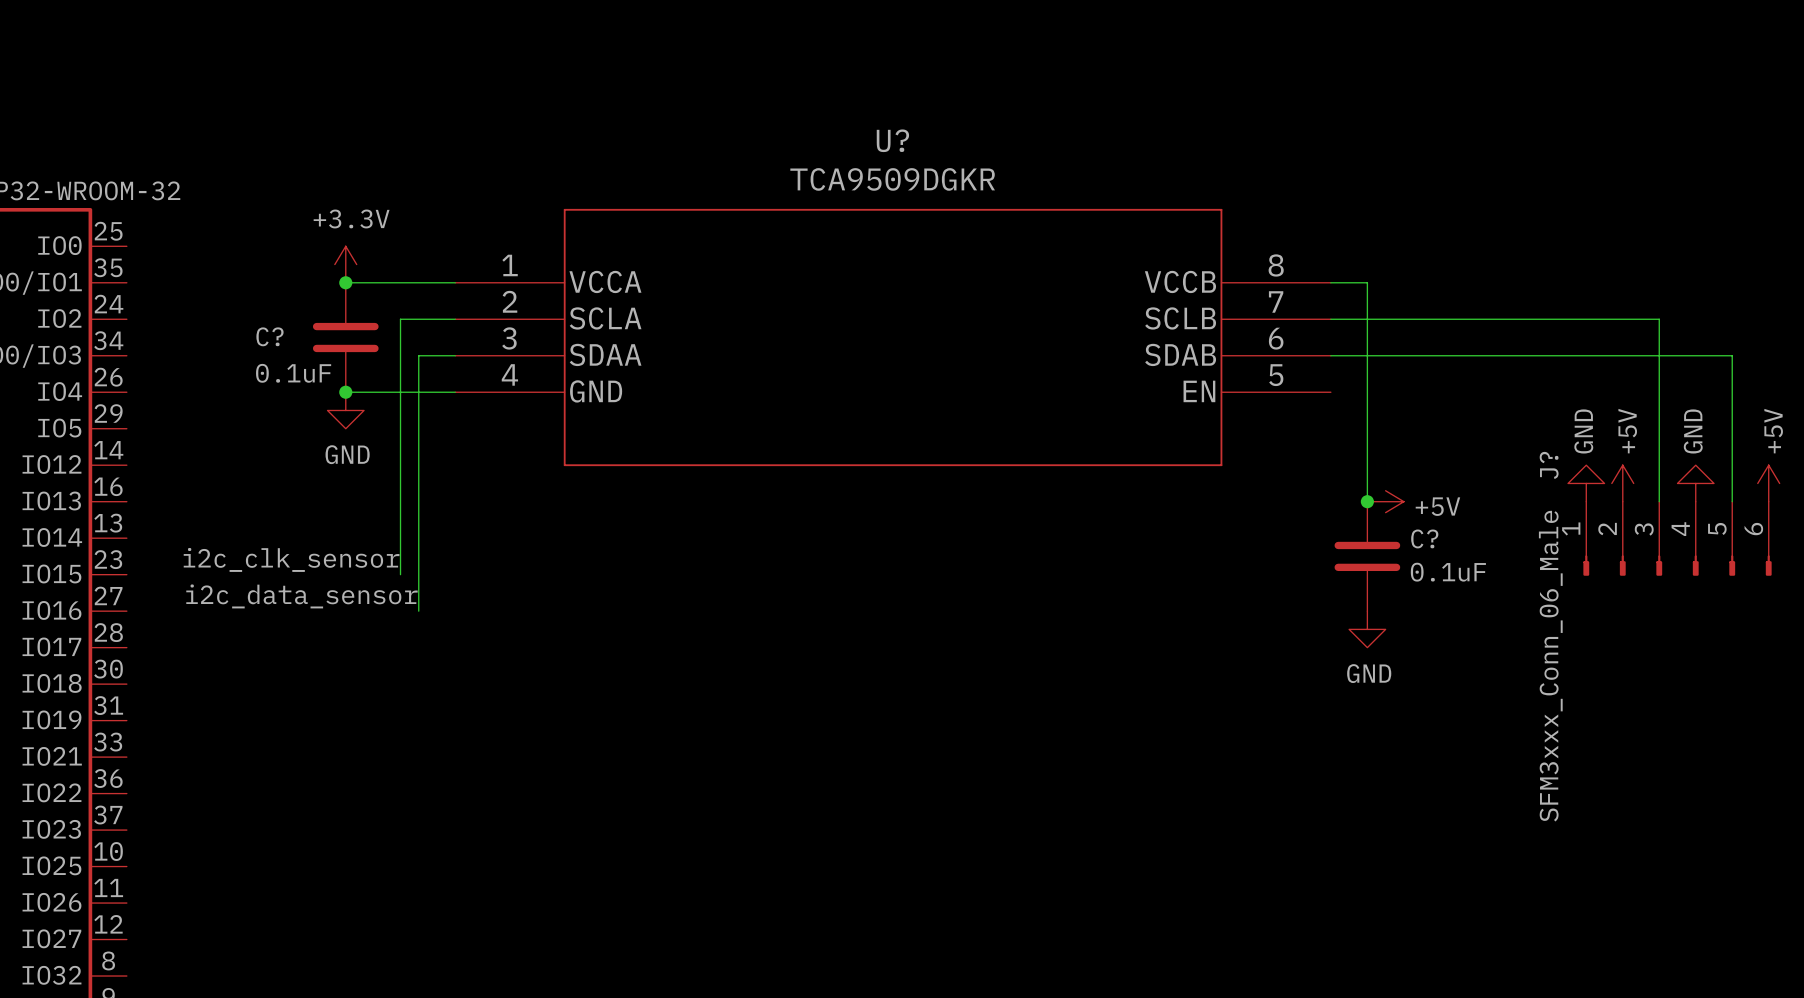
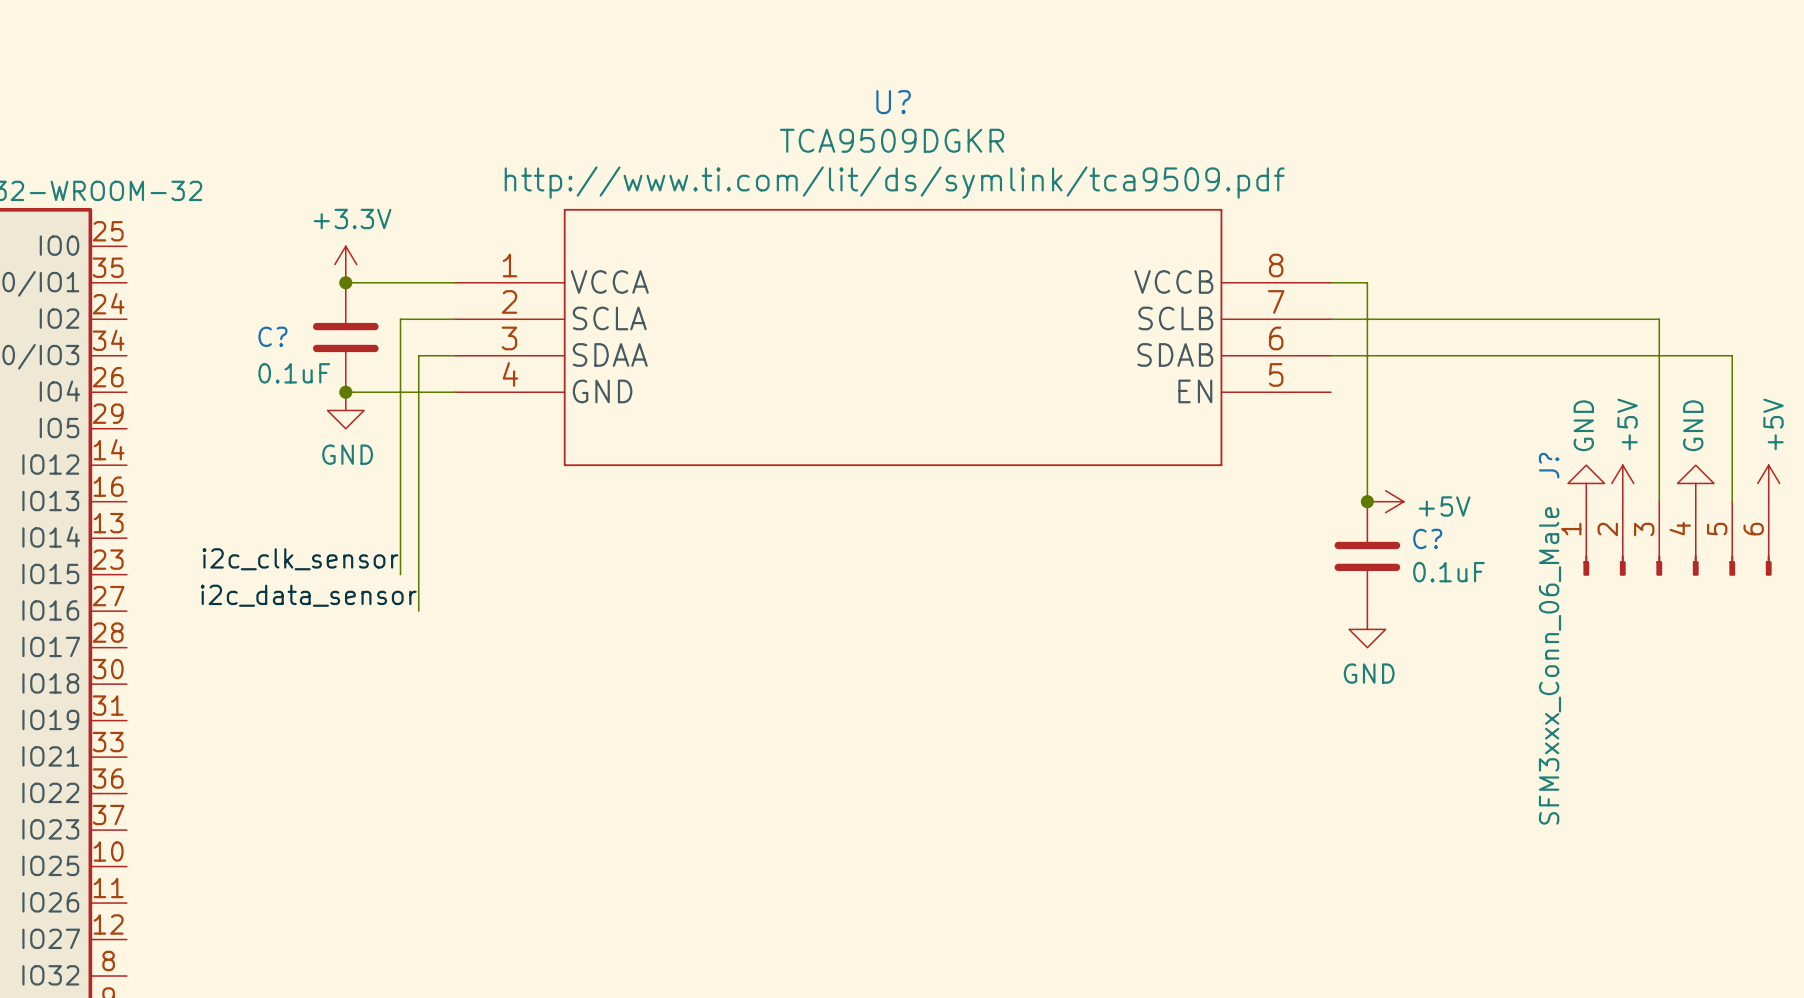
U? name position: U? (892, 140) -> U? (893, 102)
U? value position: TCA9509DGKR (892, 179) -> TCA9509DGKR (892, 140)
U? text: none -> http://www.ti.com/lit/ds/symlink/tca9509.pdf (894, 182)

